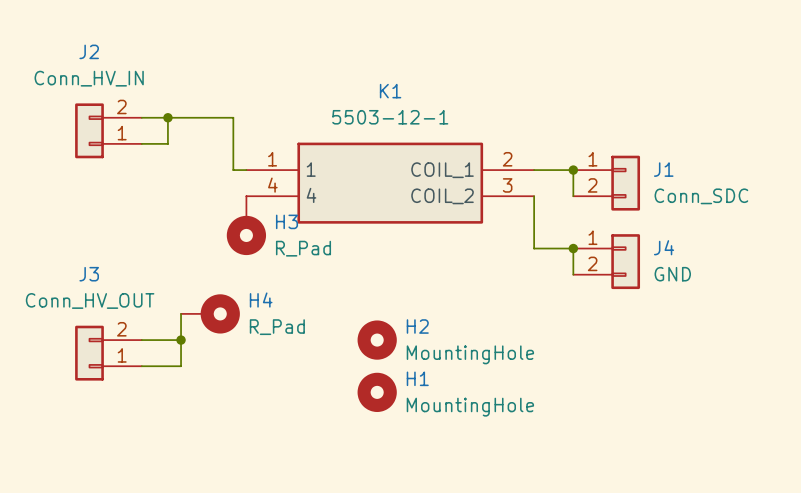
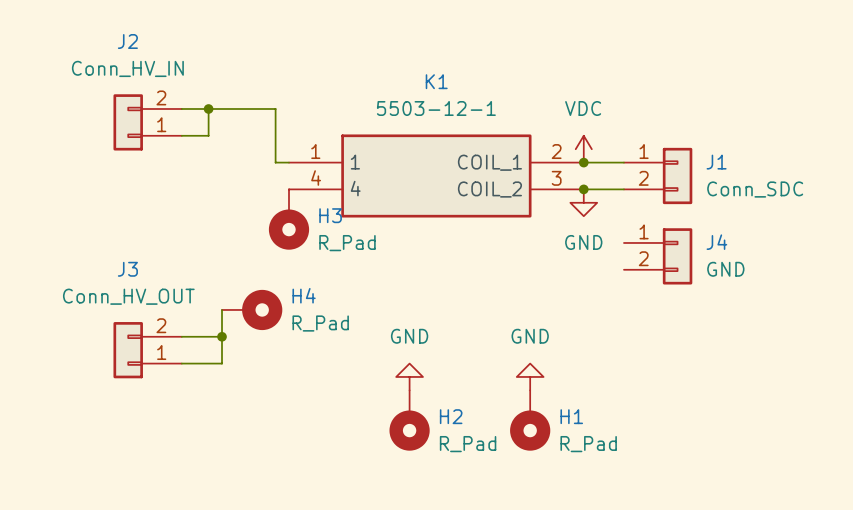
power symbol: none -> VDC (583, 149)
junction: none -> (583, 162)
wire: (573, 170) (573, 196) -> (583, 189) (623, 189)
junction: (573, 170) -> none
wire: (534, 196) (534, 248) (573, 248) (573, 274) -> none
junction: none -> (583, 189)
power symbol: none -> GND (583, 202)
junction: (573, 248) -> none
H2 symbol: [357, 320, 397, 360] -> [389, 390, 430, 451]
H2 value: MountingHole (470, 354) -> R_Pad (468, 444)
H1 symbol: [357, 372, 397, 413] -> [510, 390, 551, 451]
power symbol: none -> GND (409, 376)
power symbol: none -> GND (530, 376)
H1 value: MountingHole (470, 407) -> R_Pad (588, 444)

